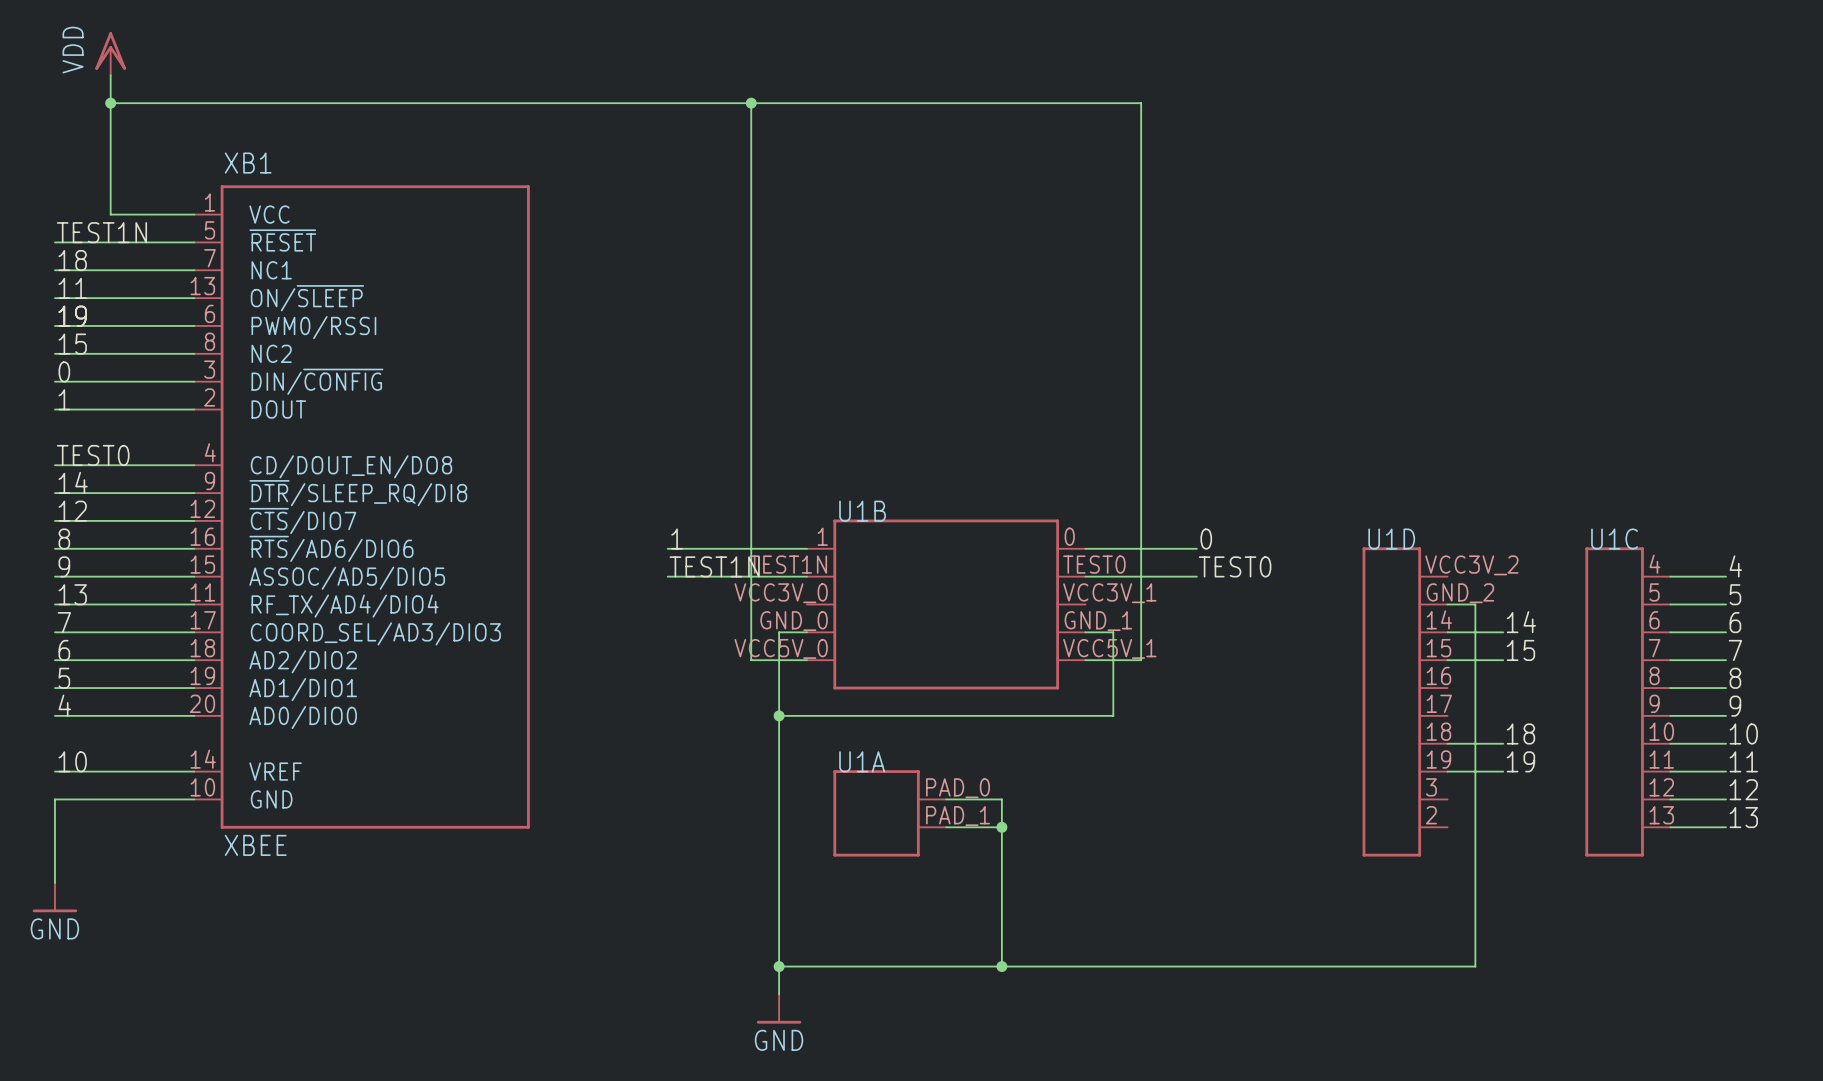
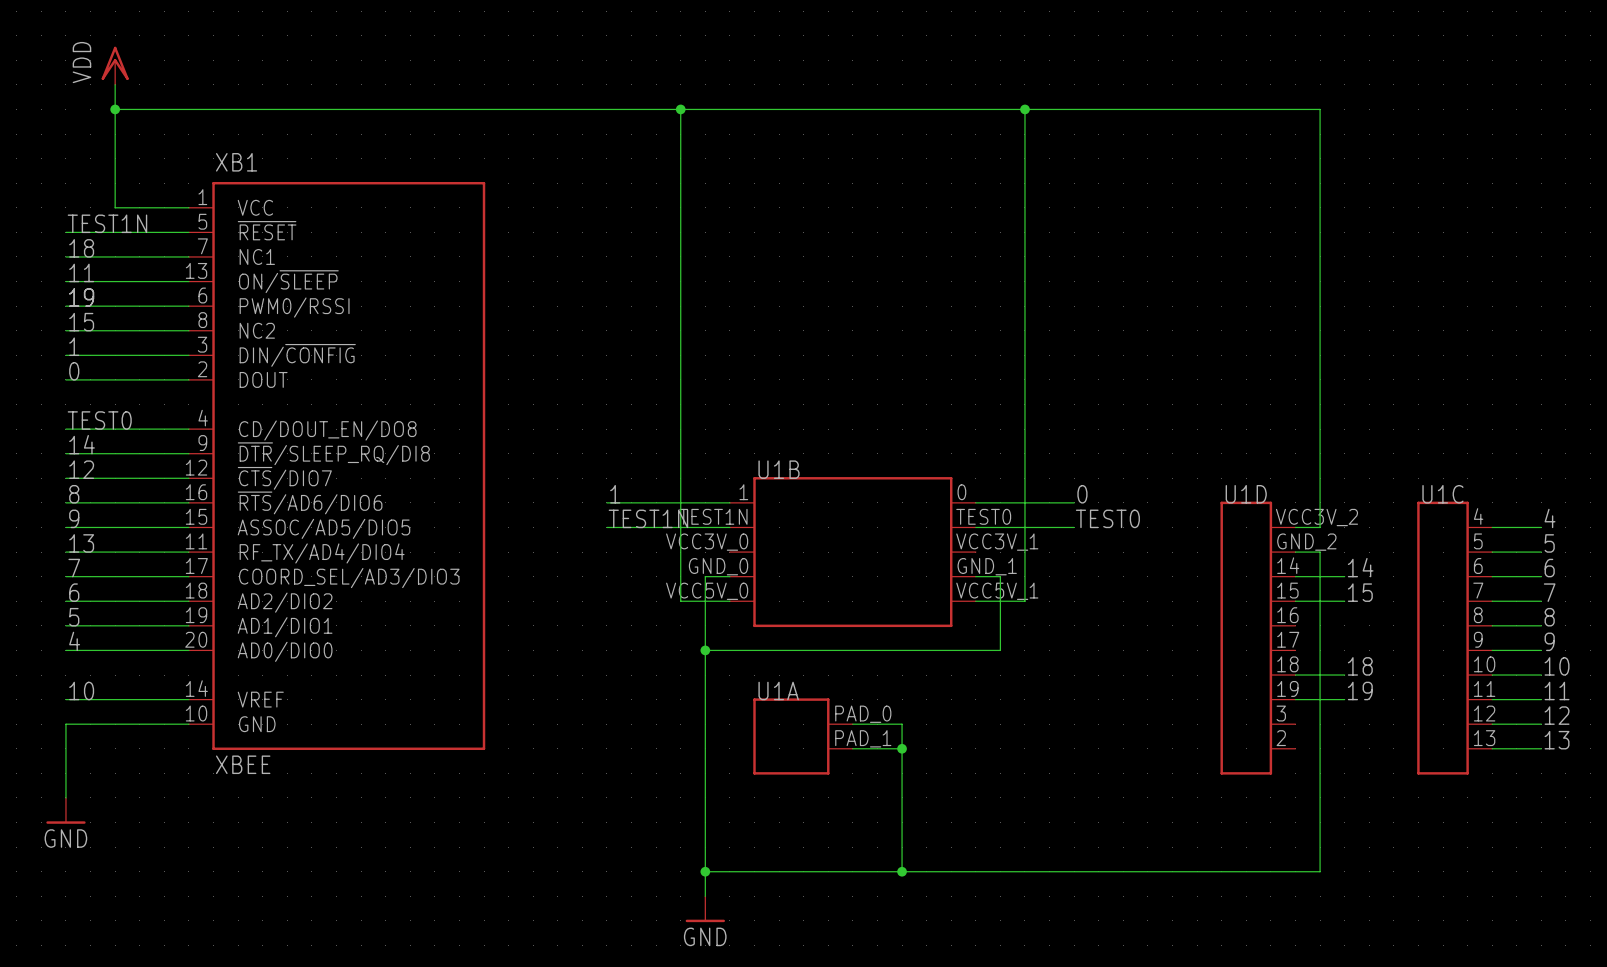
wire: none -> (1024, 109) (1320, 109) (1320, 527) (1295, 527)
junction: none -> (1024, 109)
label: 0 (64, 371) -> 1 (74, 346)
label: 1 (64, 399) -> 0 (74, 371)

